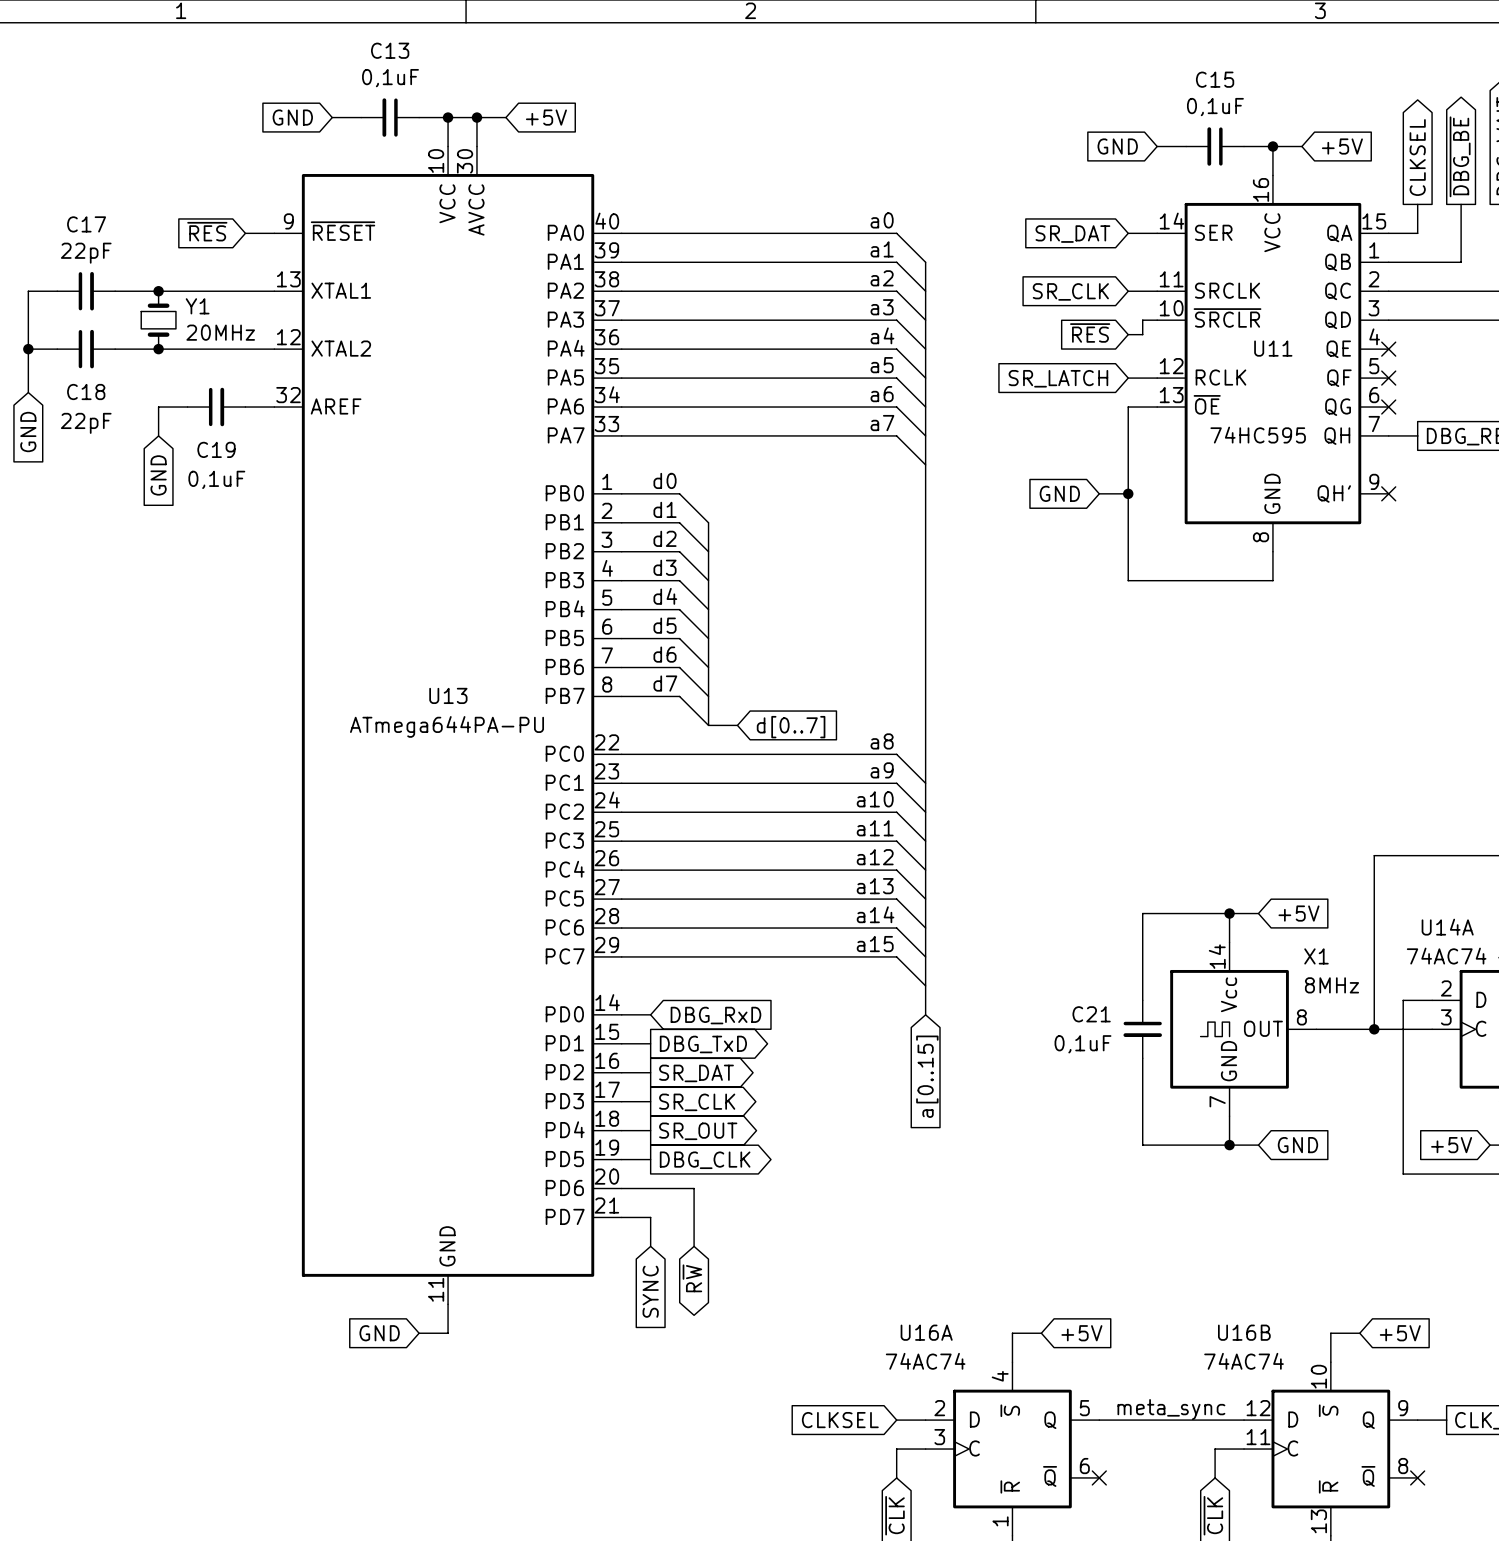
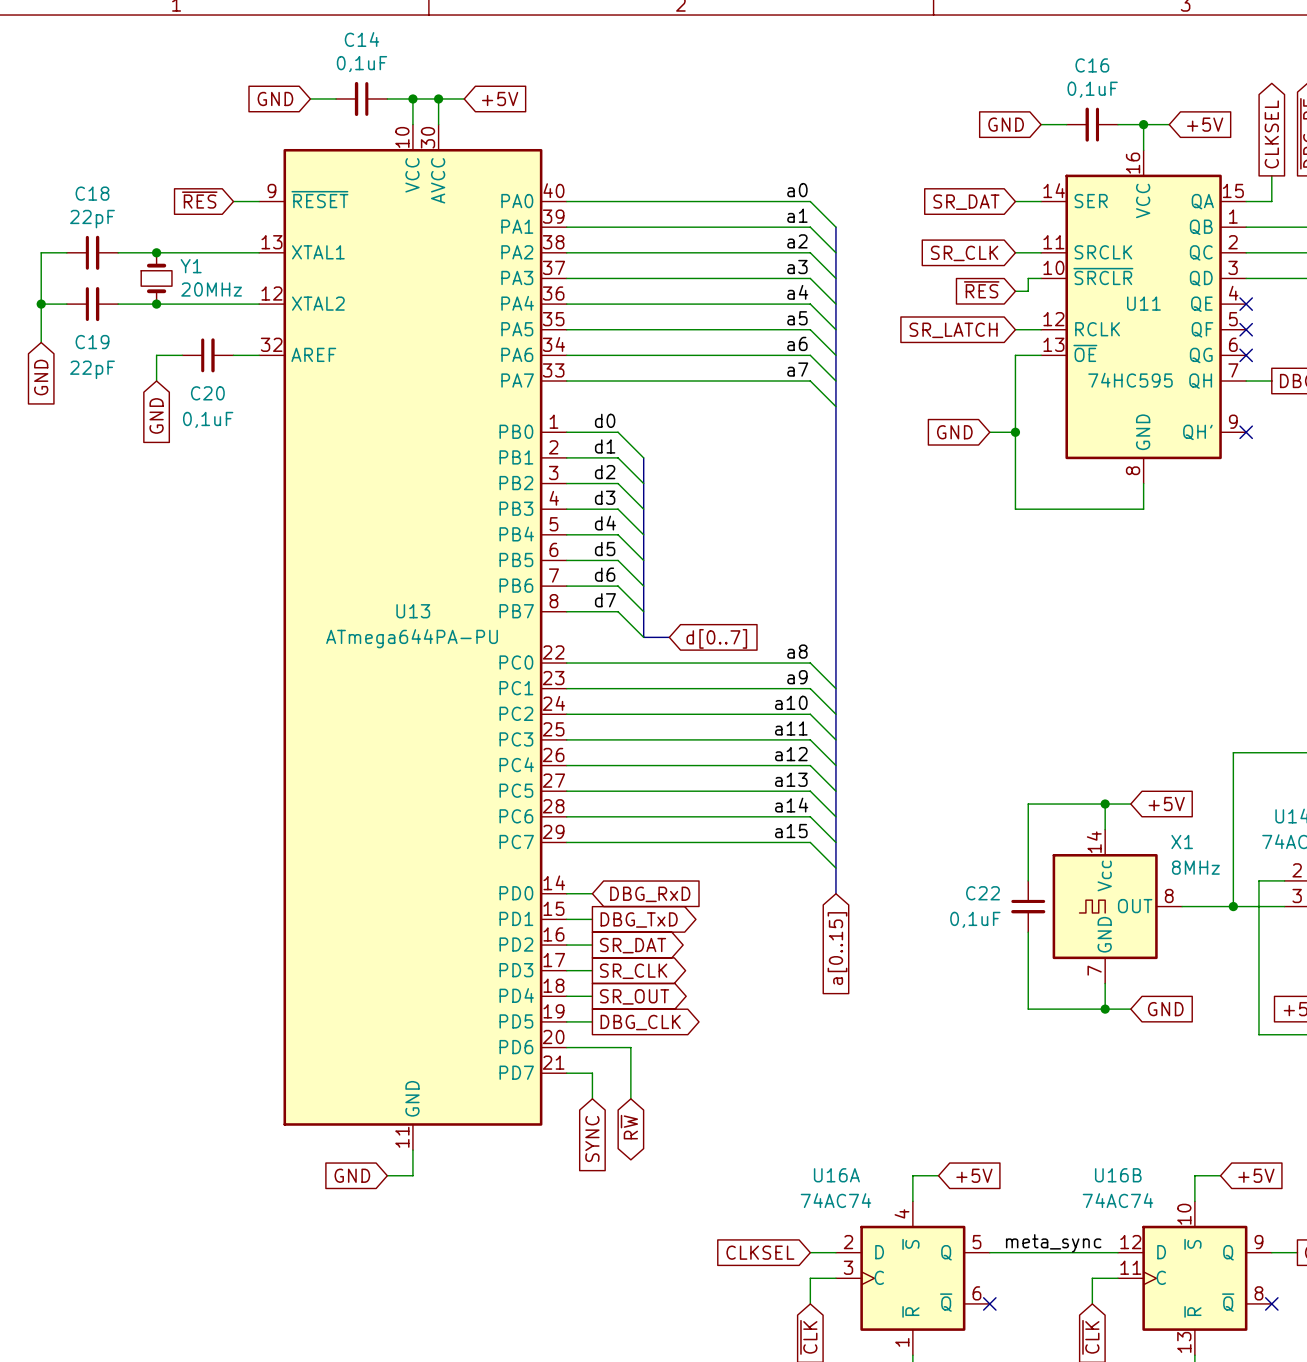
C13 name: C13 (390, 50) -> C14 (361, 39)
C15 name: C15 (1215, 79) -> C16 (1092, 65)
C17 name: C17 (86, 224) -> C18 (92, 193)
C18 name: C18 (86, 392) -> C19 (92, 342)
C19 name: C19 (216, 449) -> C20 (207, 393)
C21 name: C21 (1091, 1014) -> C22 (982, 893)

